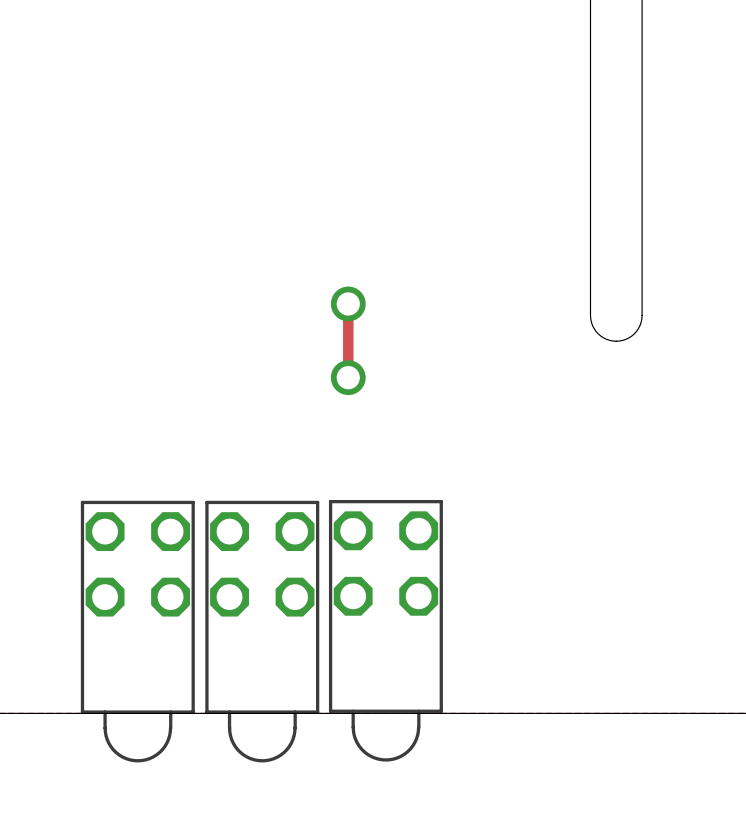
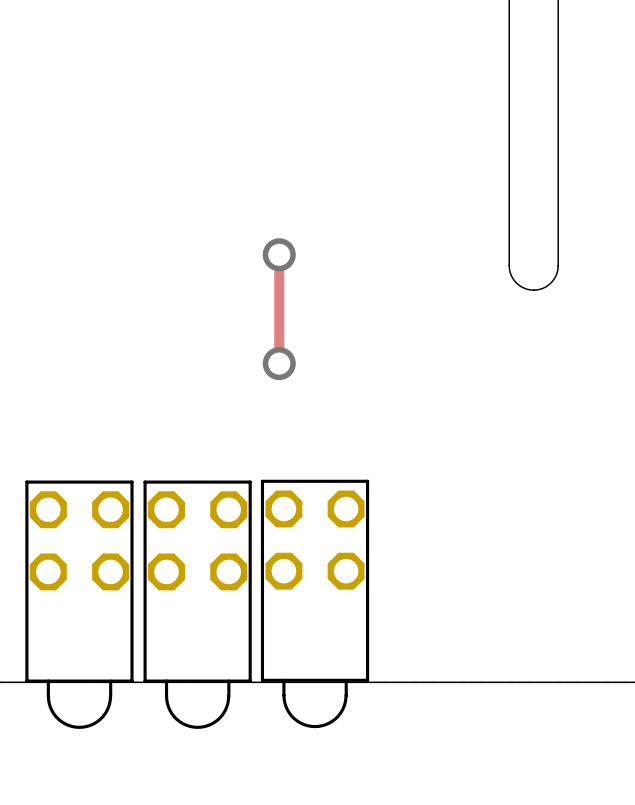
track: none -> (279, 254) (279, 293)
board edge: (590, 274) (590, 315) (592, 325) (600, 335) (616, 341) (631, 335) (640, 325) (642, 315) (642, 274) -> (509, 265) (511, 275) (516, 282) (524, 288) (533, 290) (543, 288) (551, 282) (556, 275) (558, 265)
via position: (348, 303) -> (279, 254)

